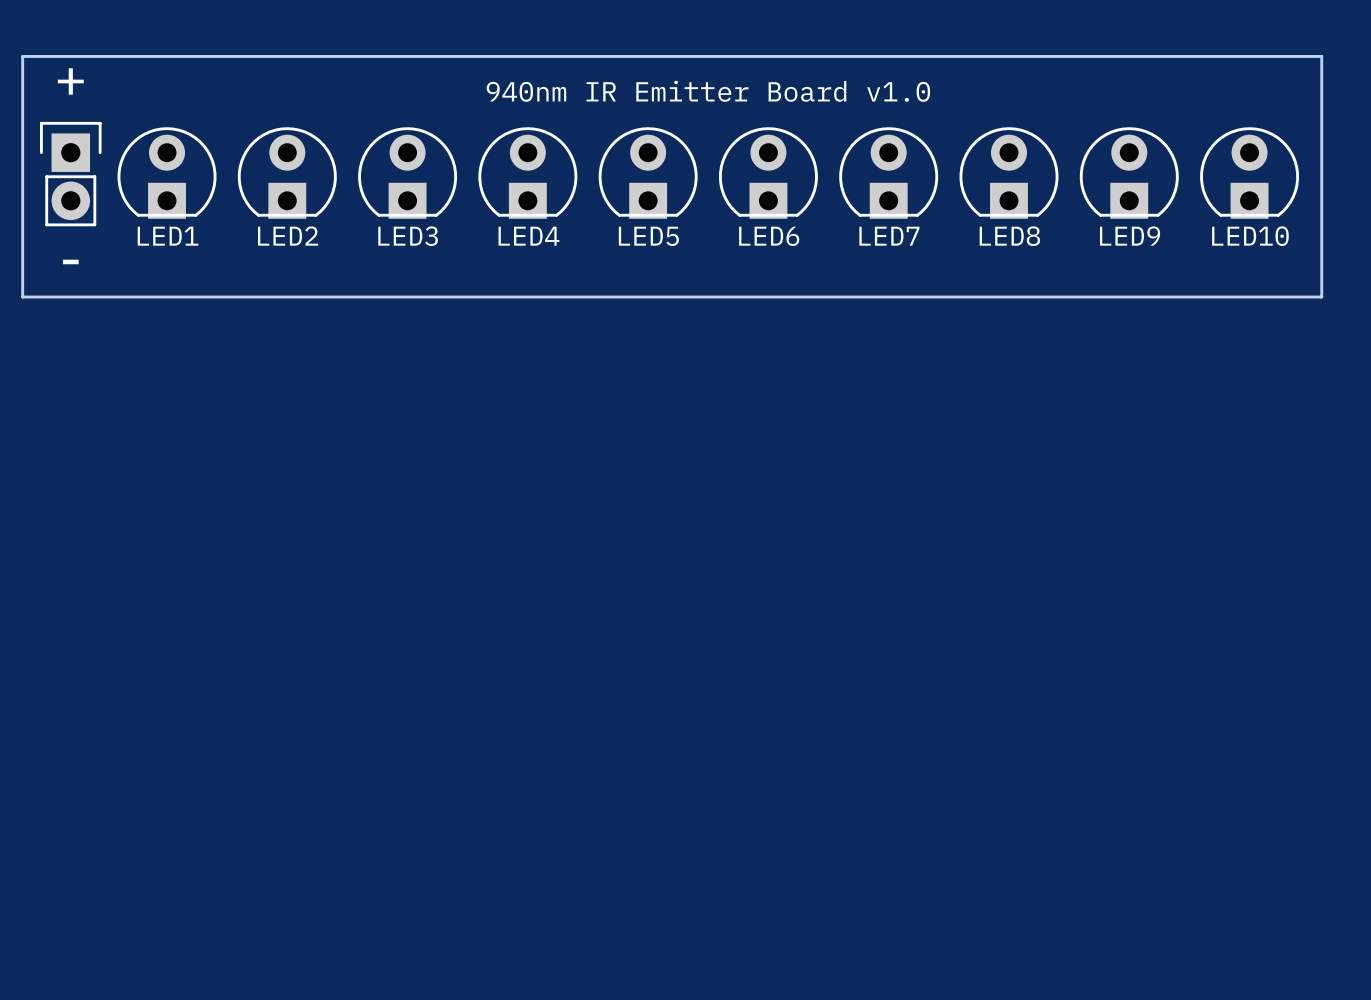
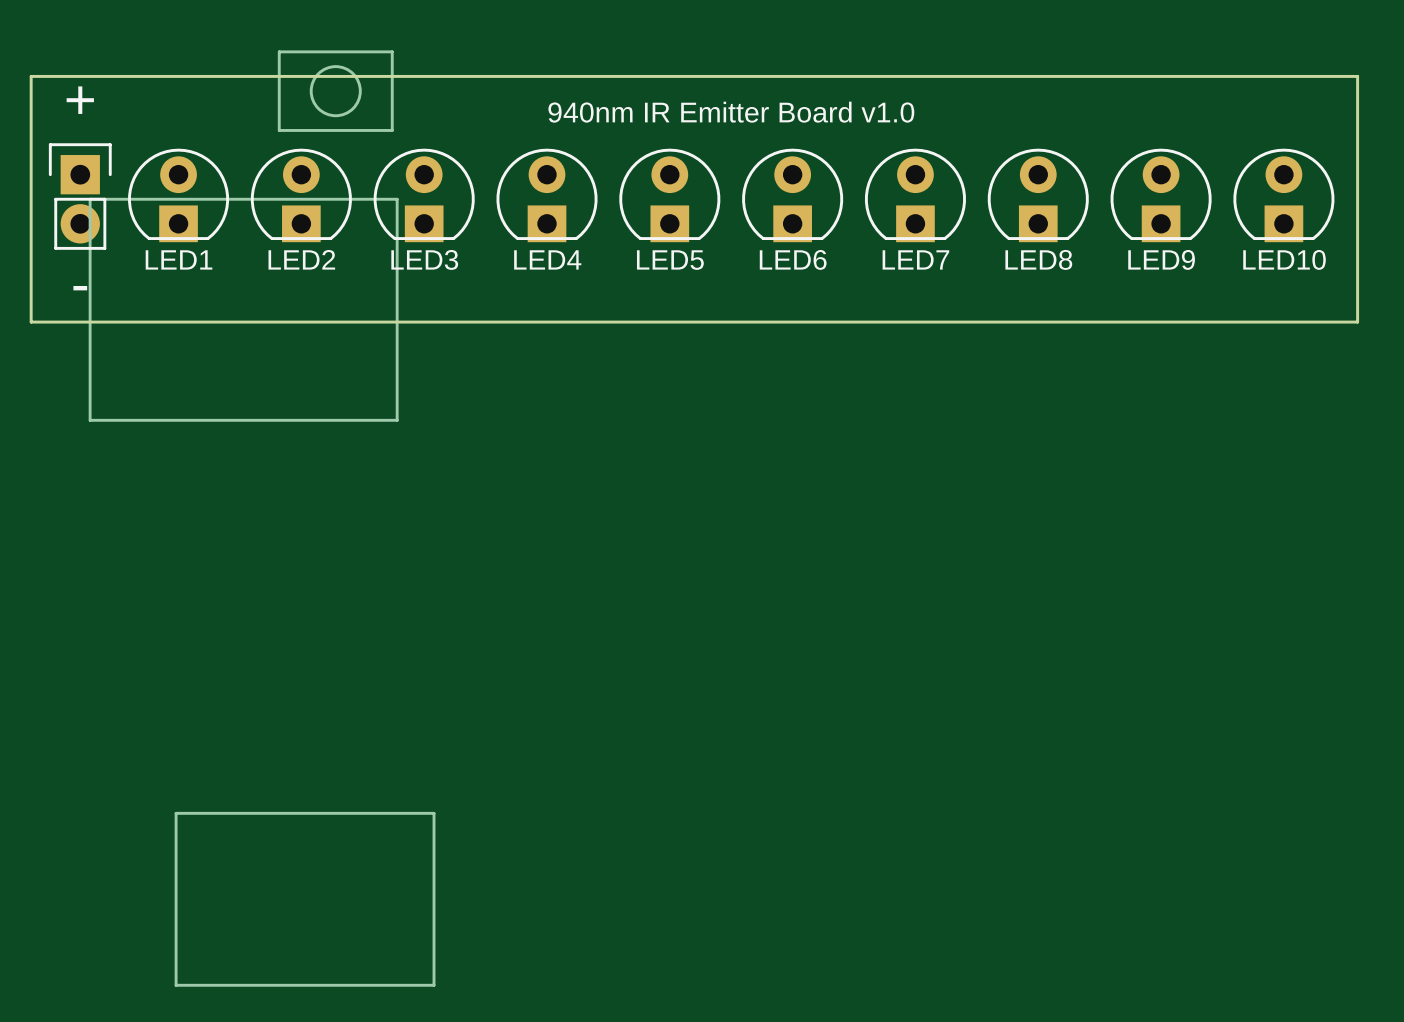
line: none -> (279, 51) (279, 130) (392, 130) (392, 51) (279, 51)
drawing: none -> [309, 65, 362, 118]
line: none -> (90, 199) (90, 420) (397, 420) (397, 199) (90, 199)
line: none -> (176, 813) (176, 985) (434, 985) (434, 813) (176, 813)

